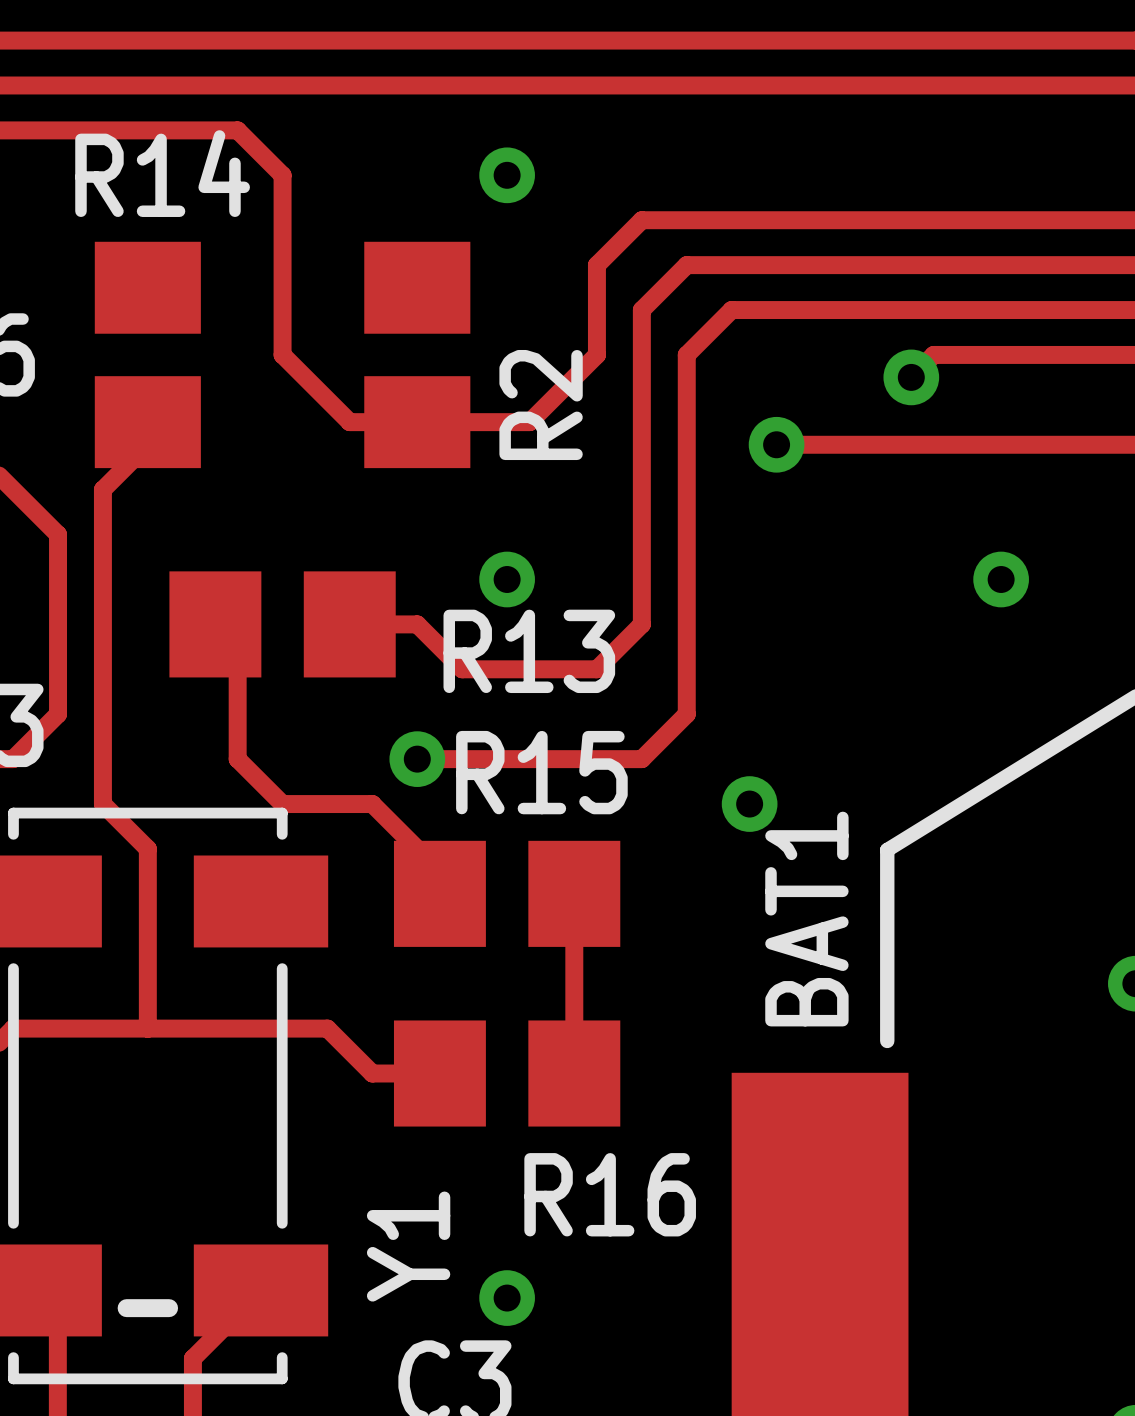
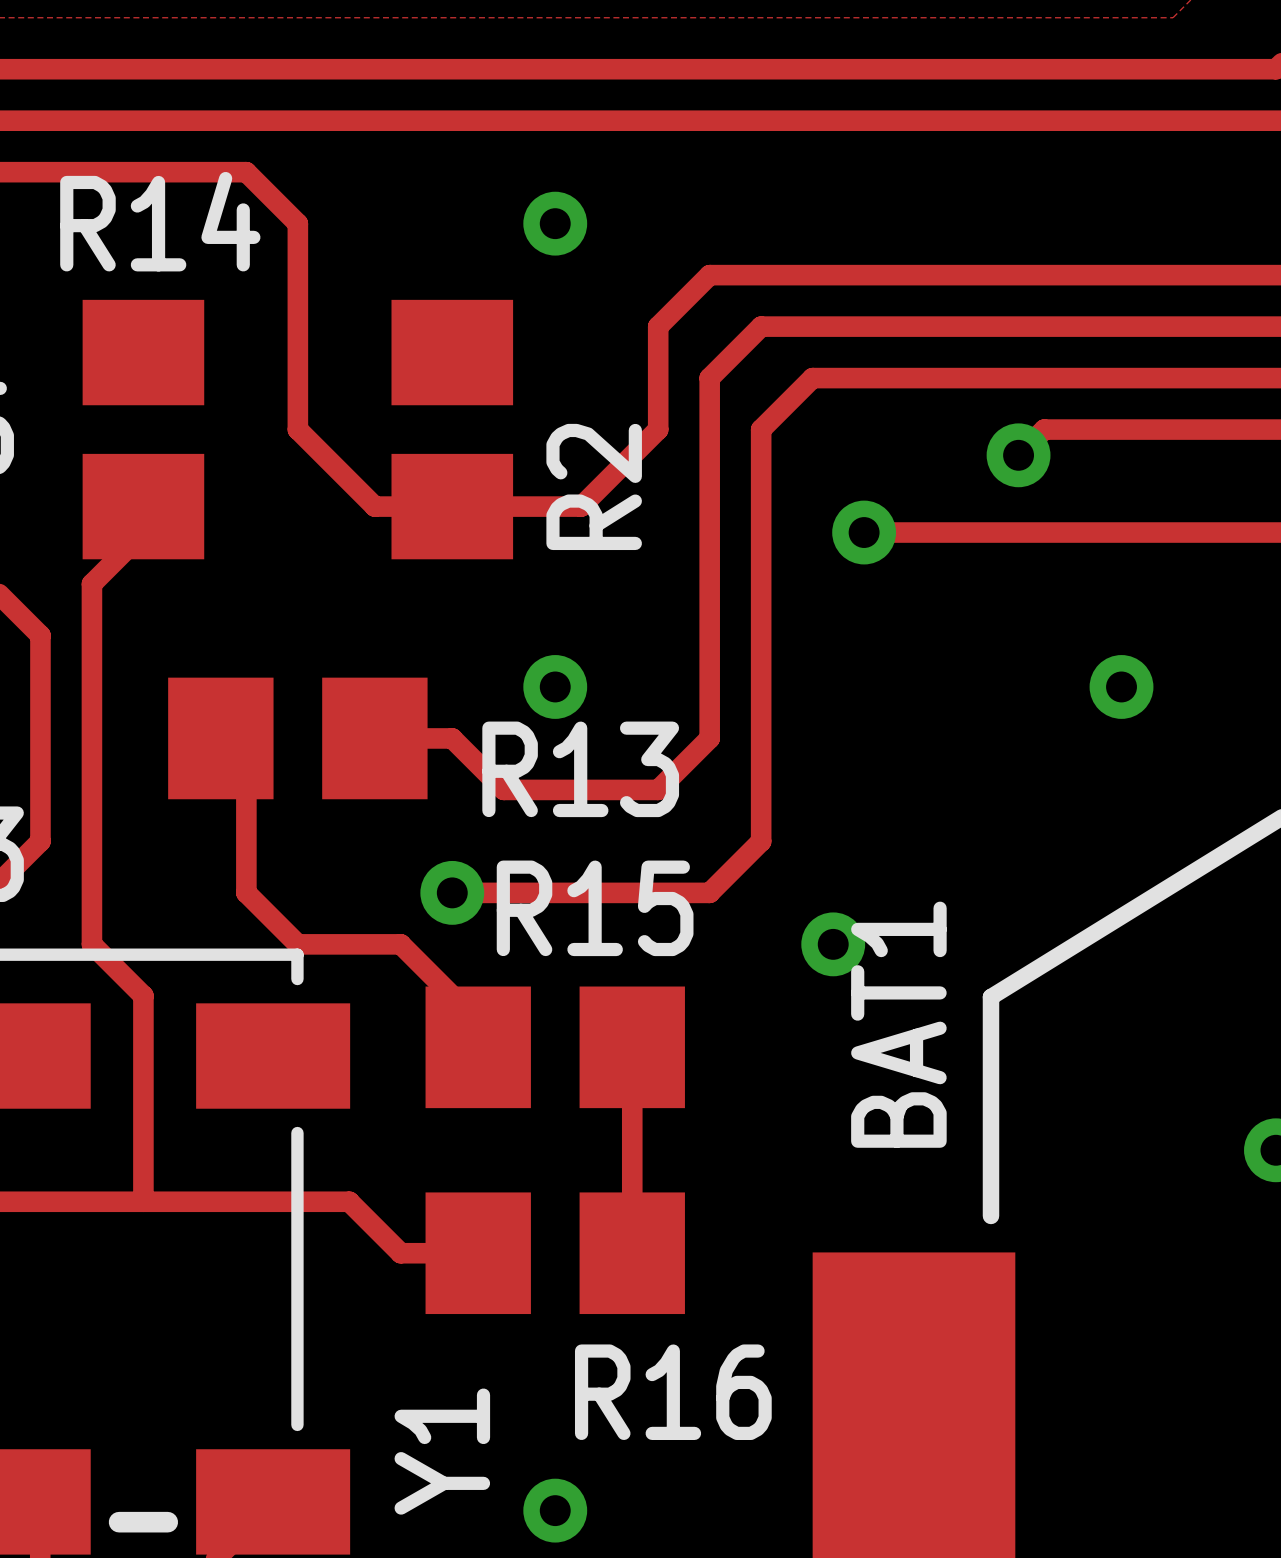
BAT1 name position: BAT1 (806, 919) -> BAT1 (898, 1024)

